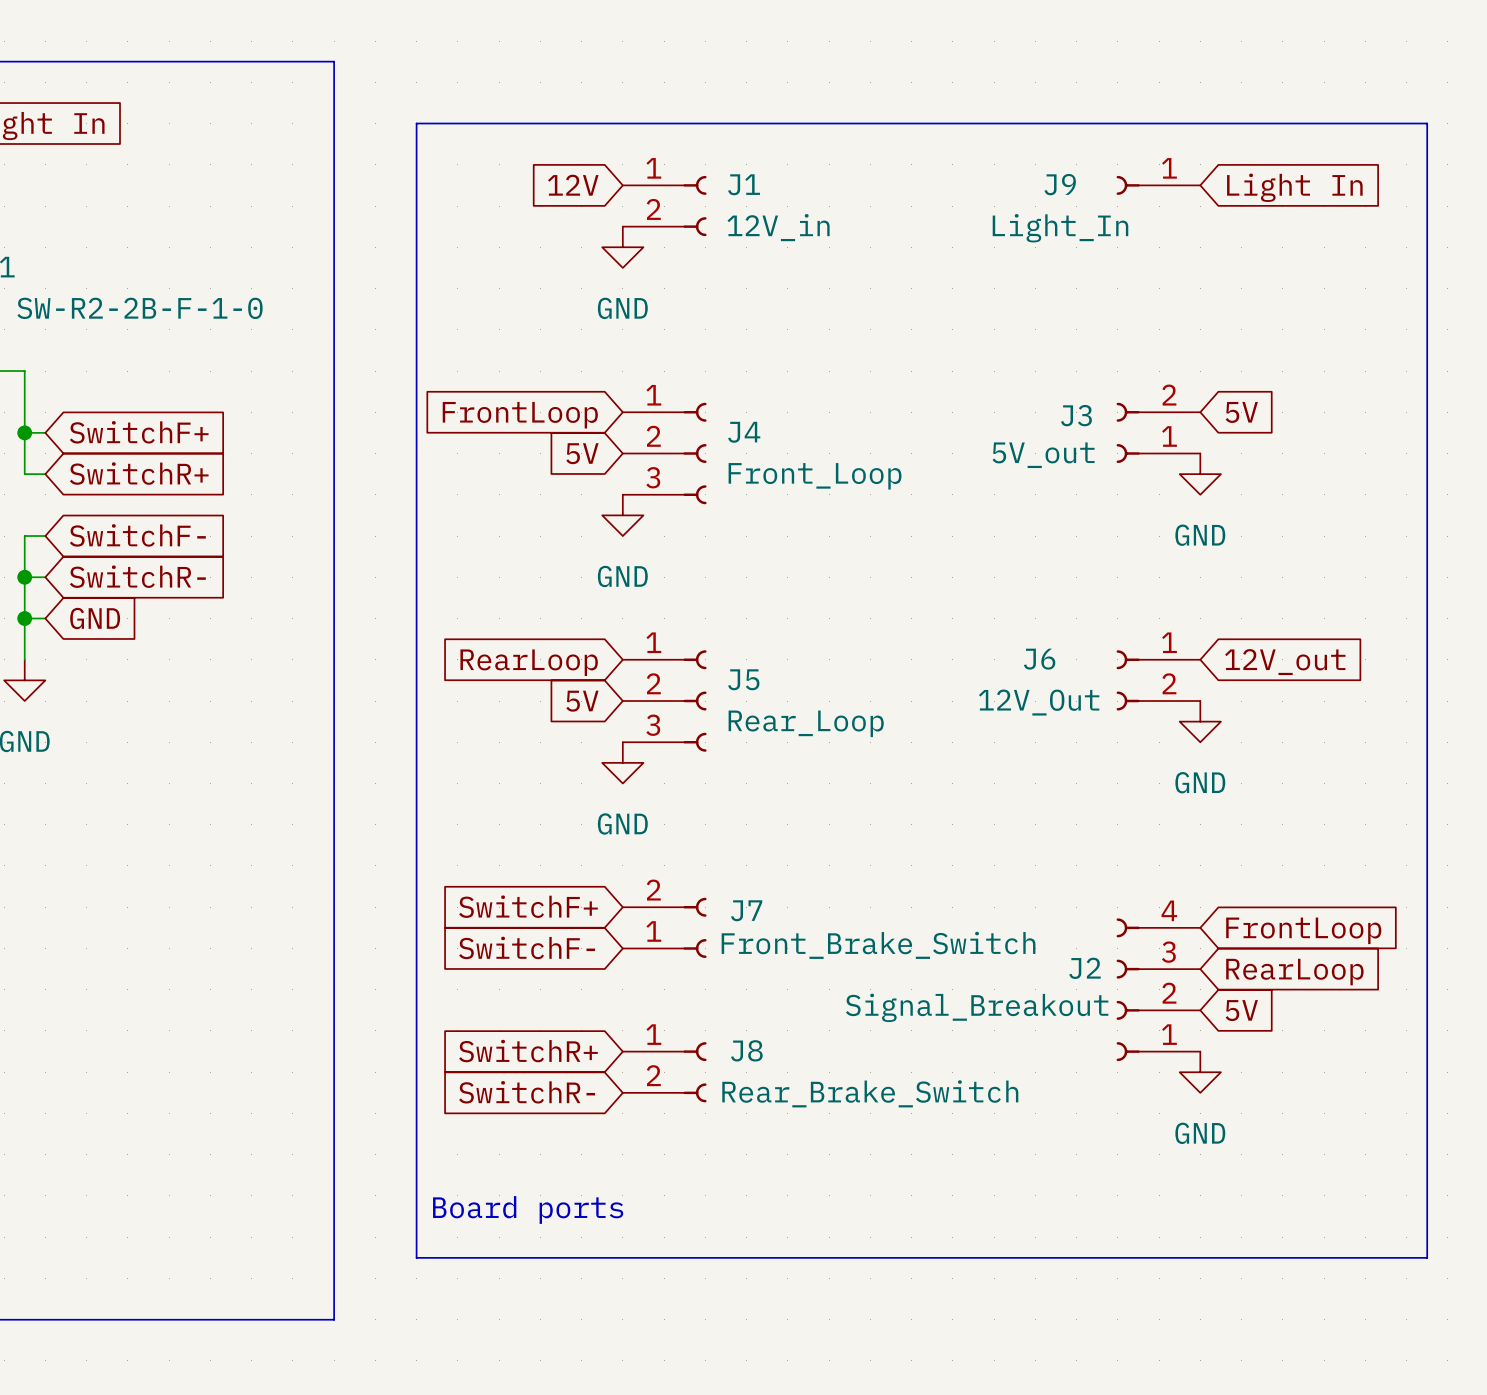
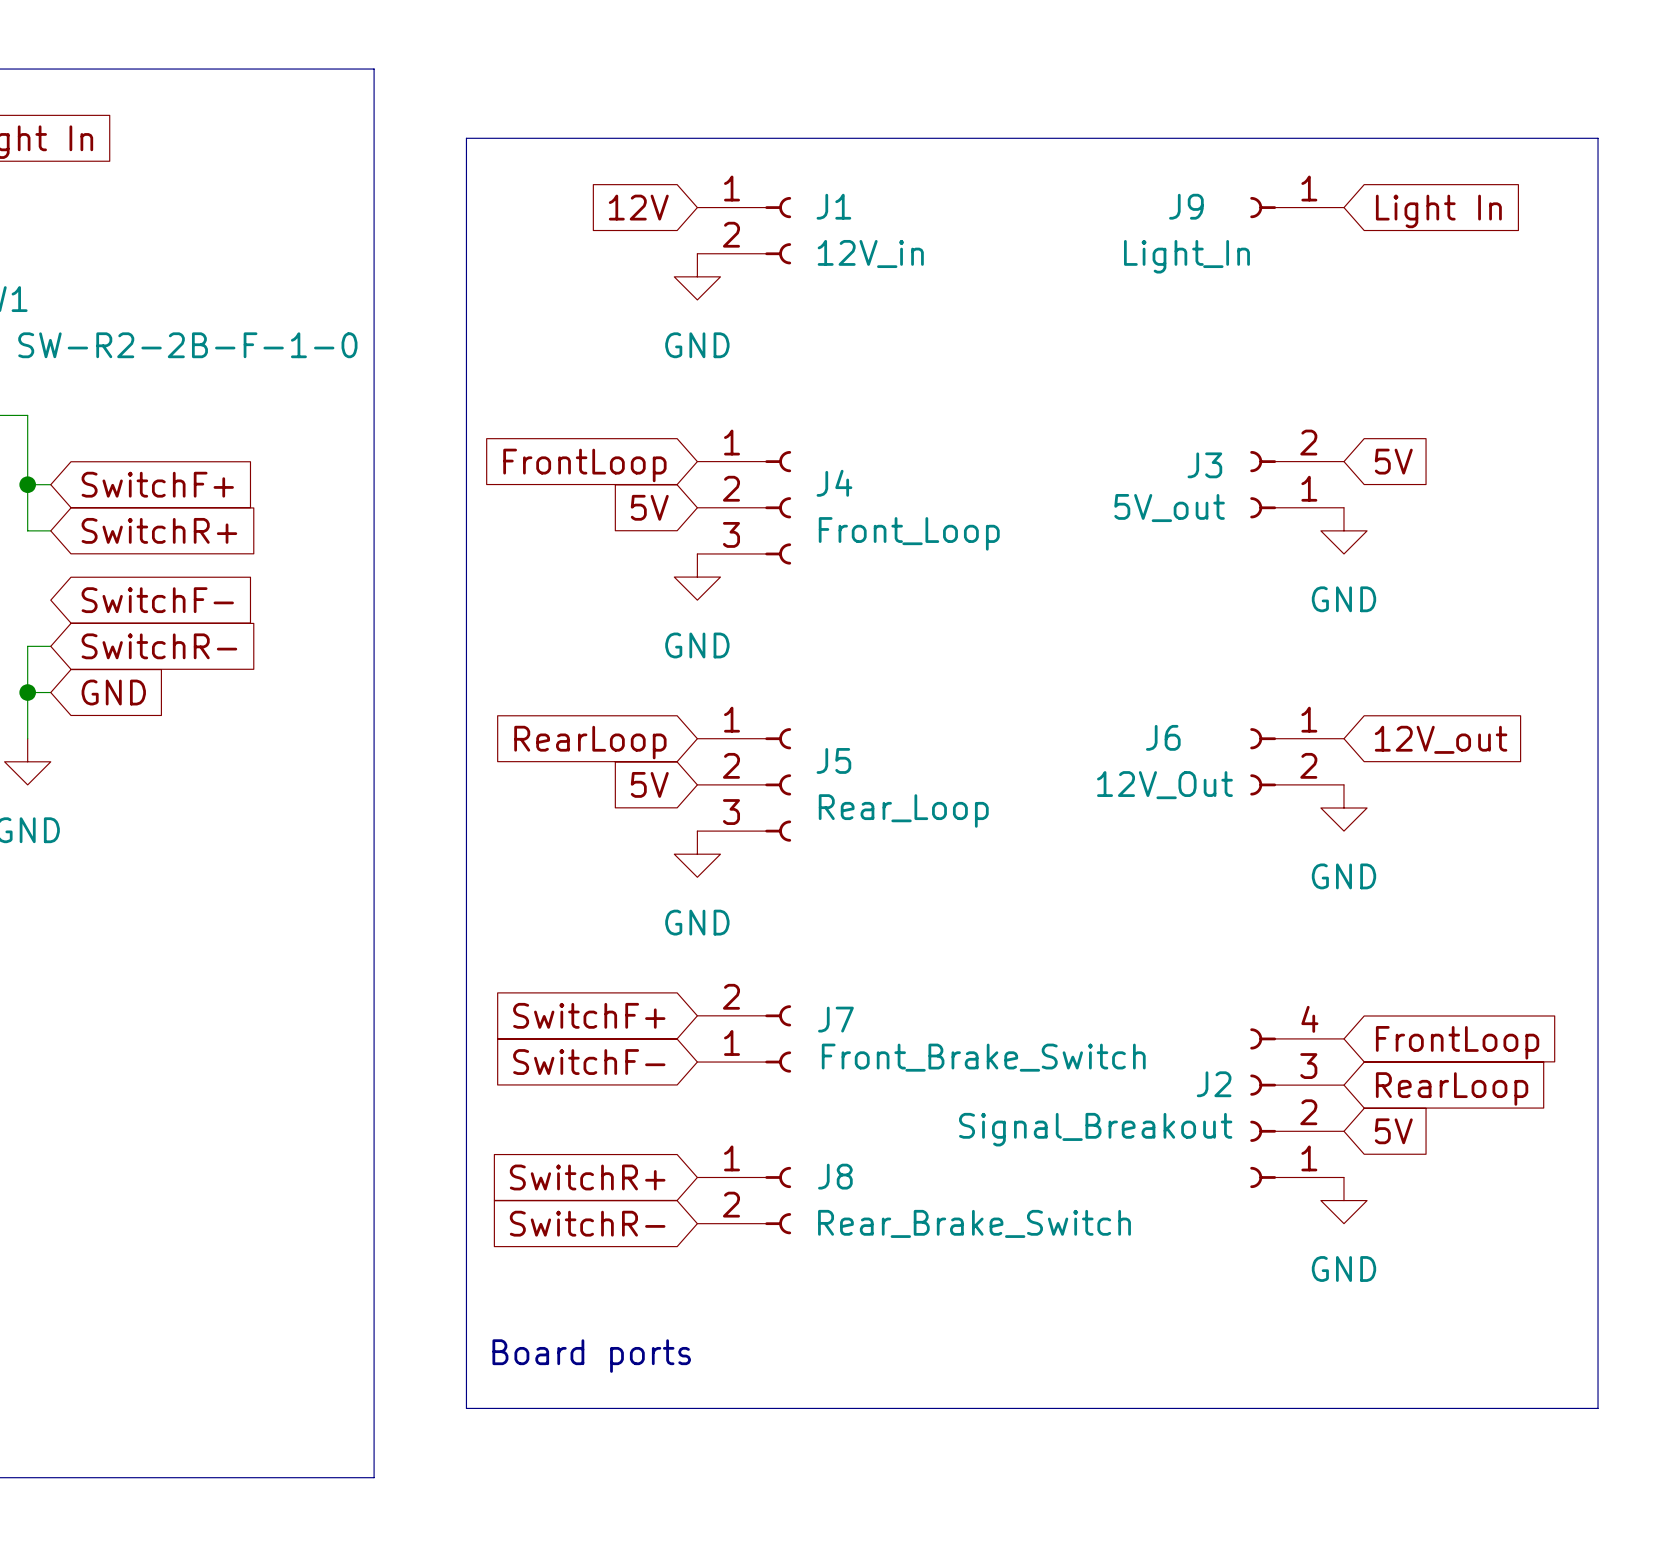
wire: (45, 536) (24, 536) (24, 577) -> none
junction: (24, 577) -> none

